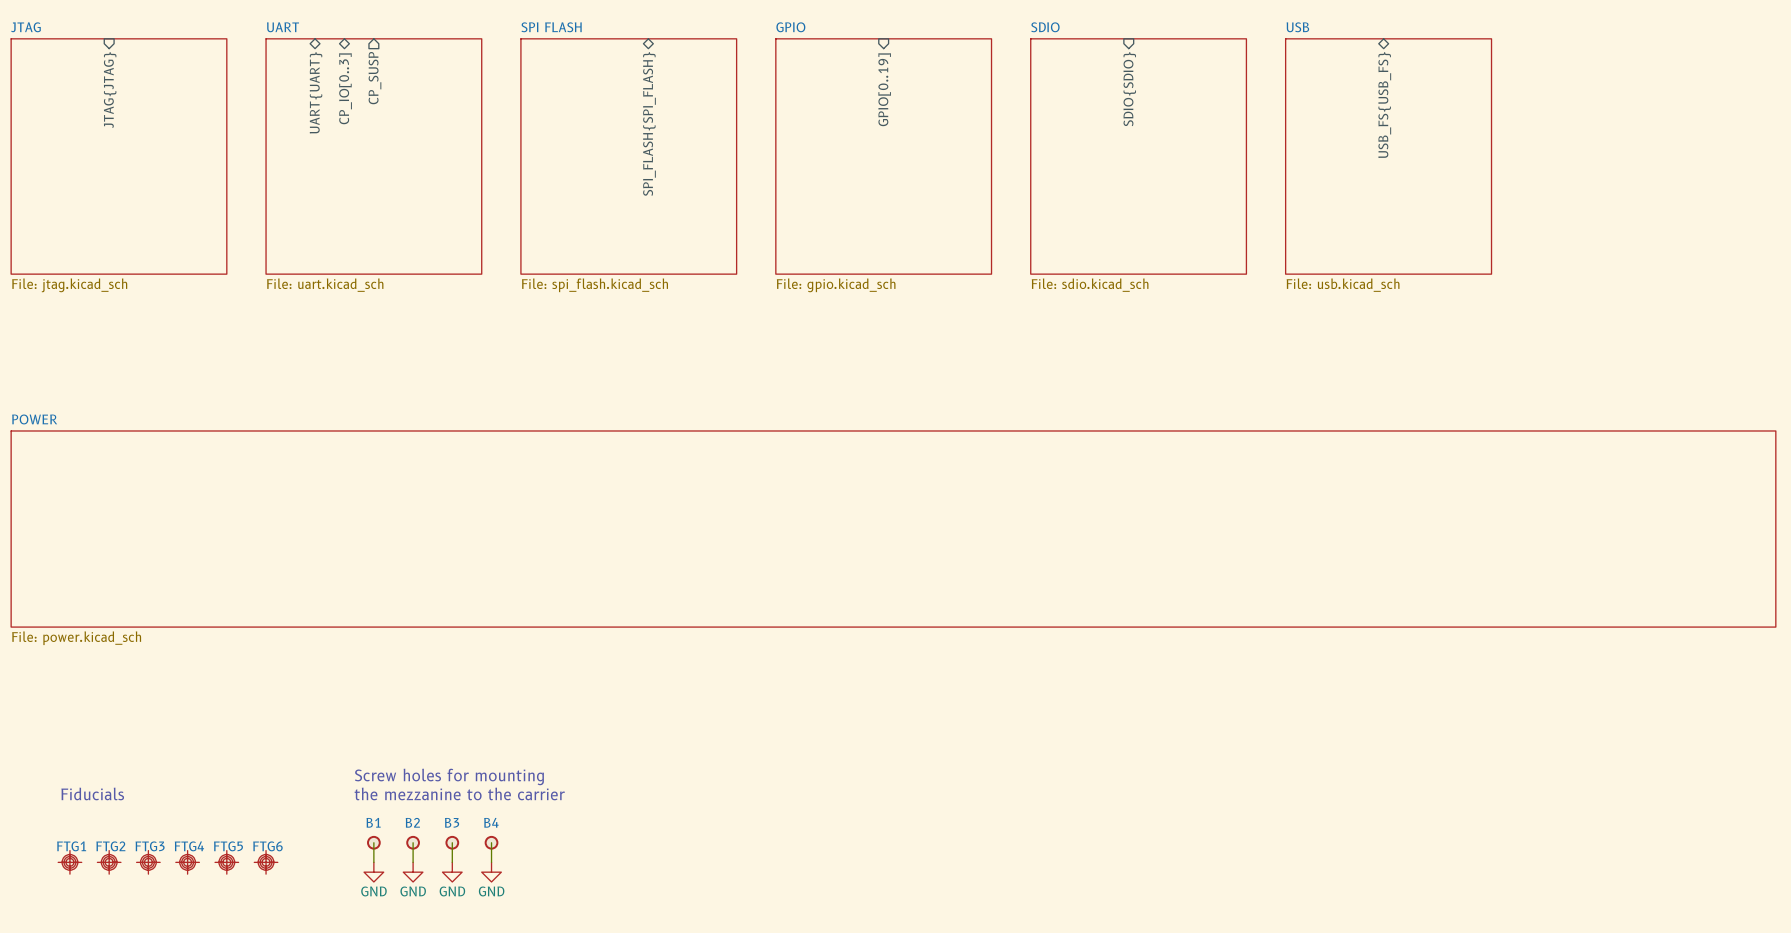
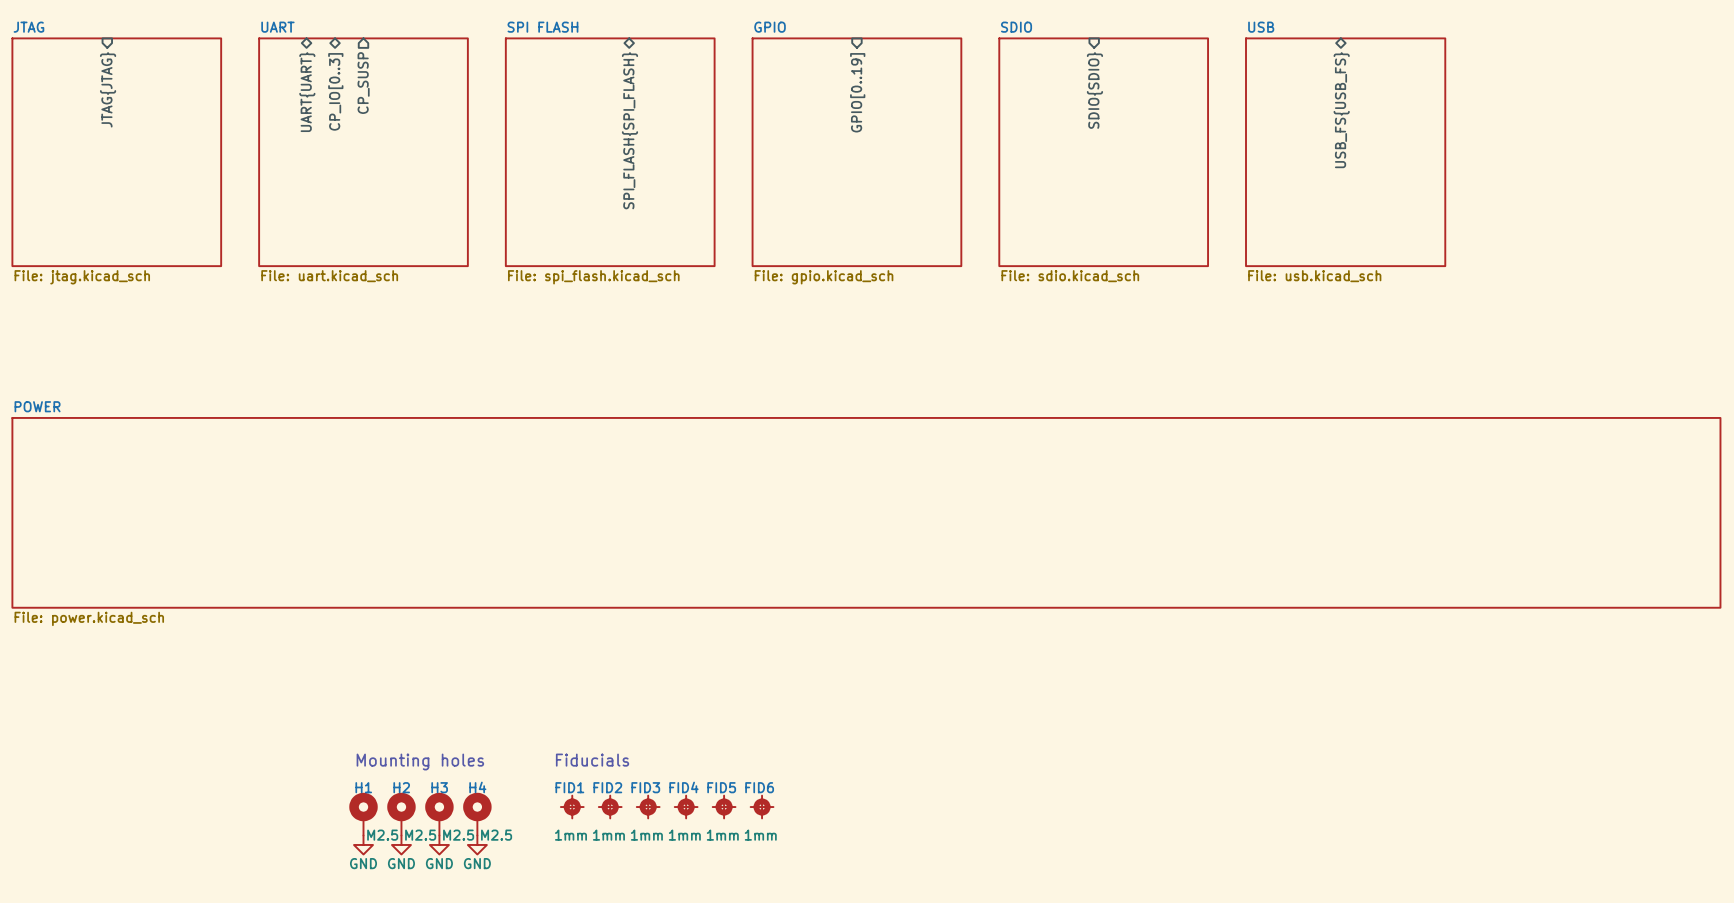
text: Screw holes for mounting (449, 776) -> none
text: none -> Fiducials (592, 760)
text: none -> Mounting holes (420, 762)
text: Fiducials (92, 793) -> none
text: the mezzanine to the carrier (459, 793) -> none
FID1: none -> 1mm (572, 807)
FID2: none -> 1mm (610, 807)
FID3: none -> 1mm (648, 807)
FID4: none -> 1mm (686, 807)
FID5: none -> 1mm (724, 807)
FID6: none -> 1mm (762, 807)
H1: none -> M2.5 (363, 814)
H2: none -> M2.5 (401, 814)
H3: none -> M2.5 (439, 814)
H4: none -> M2.5 (477, 814)
B1: (373, 842) -> none
B2: (413, 842) -> none
B3: (452, 842) -> none
B4: (491, 842) -> none
FTG1: (69, 862) -> none
FTG2: (109, 862) -> none
FTG3: (148, 862) -> none
FTG4: (187, 862) -> none
FTG5: (226, 862) -> none
FTG6: (266, 862) -> none

